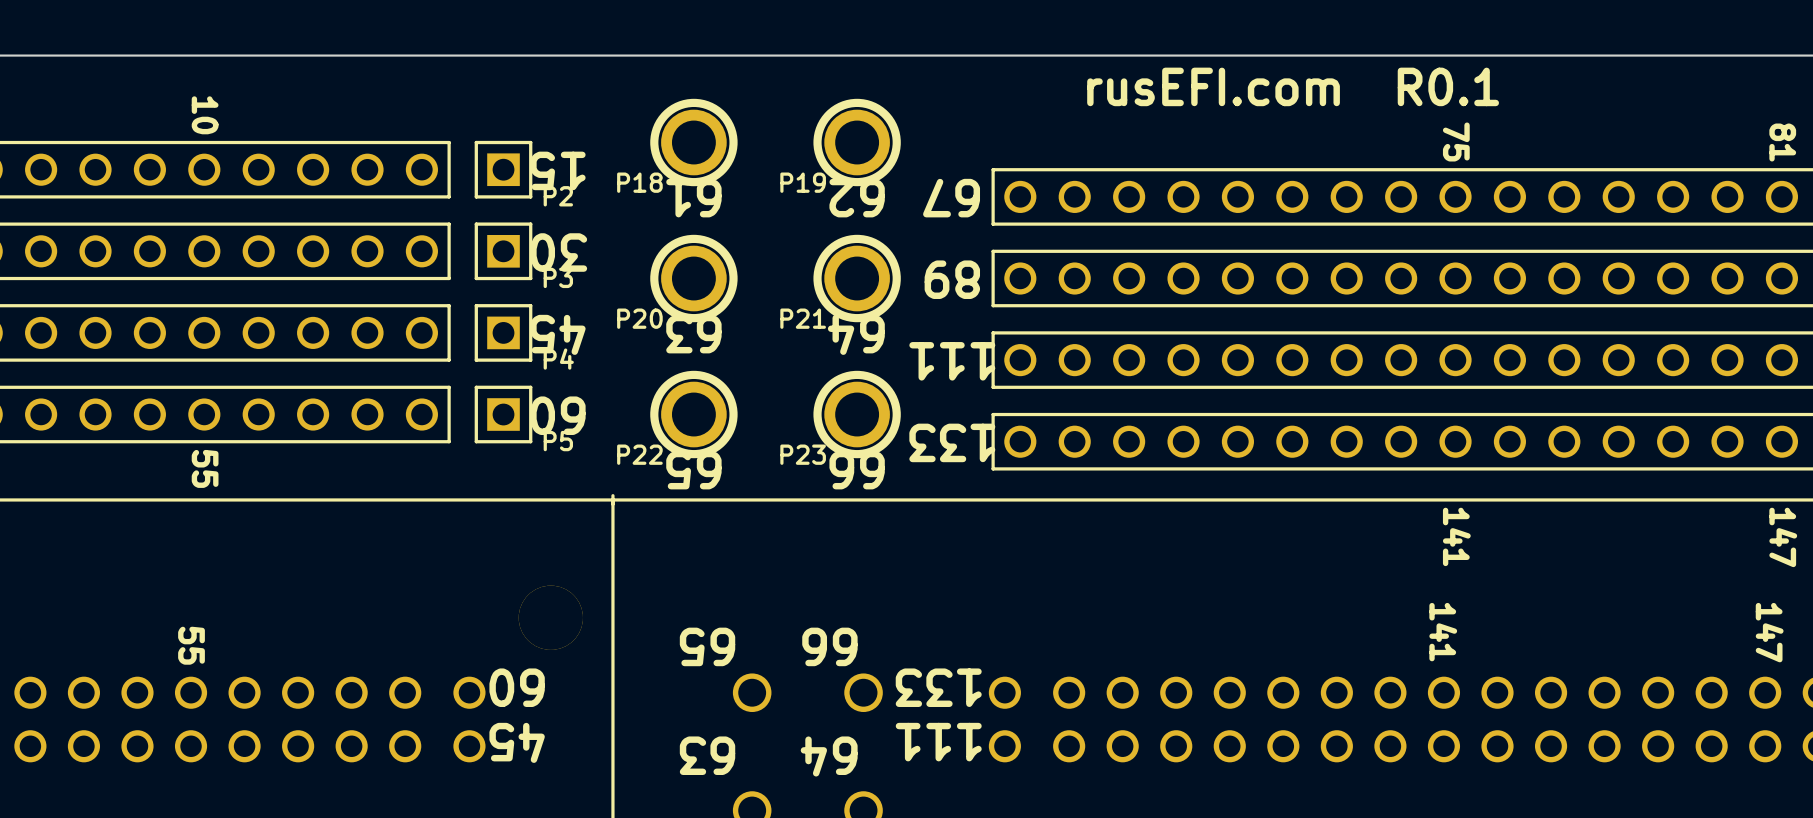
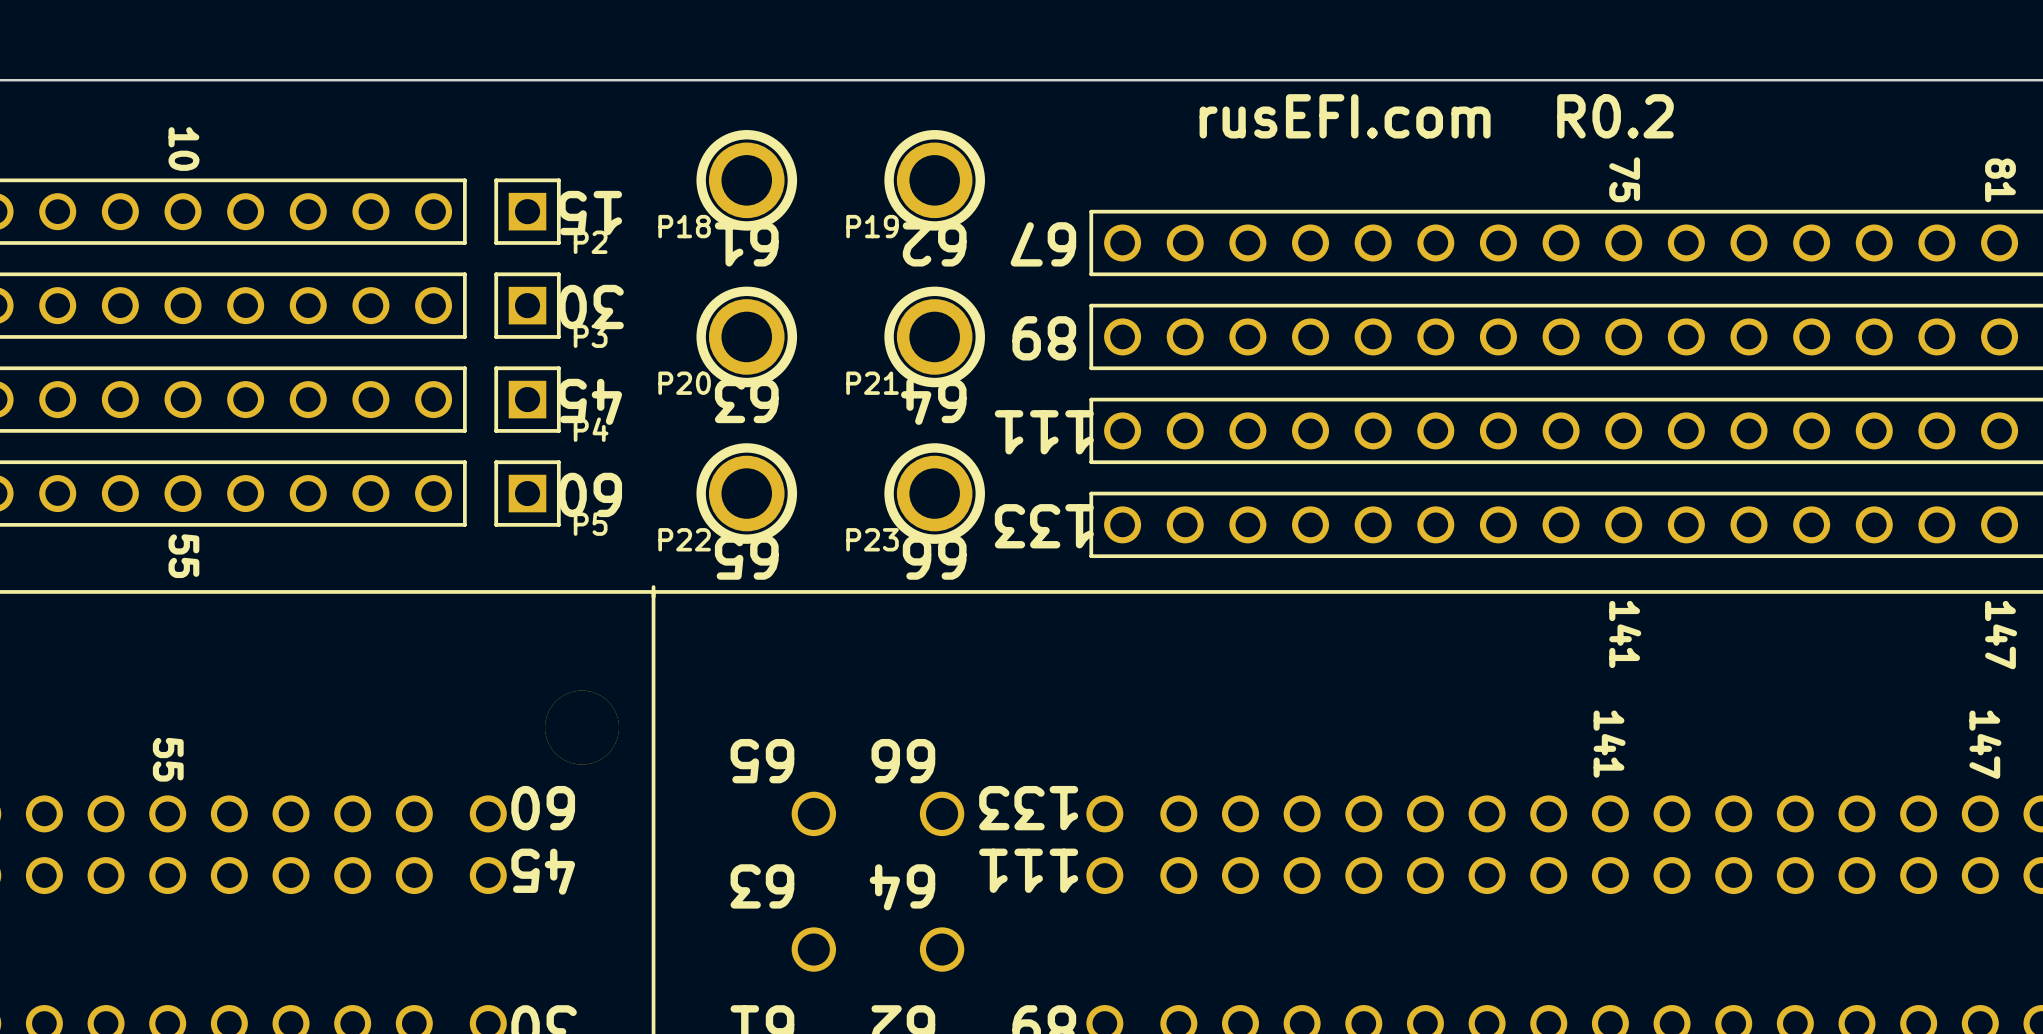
text: rusEFI.com R0.1 (1293, 86) -> rusEFI.com R0.2 (1436, 116)

